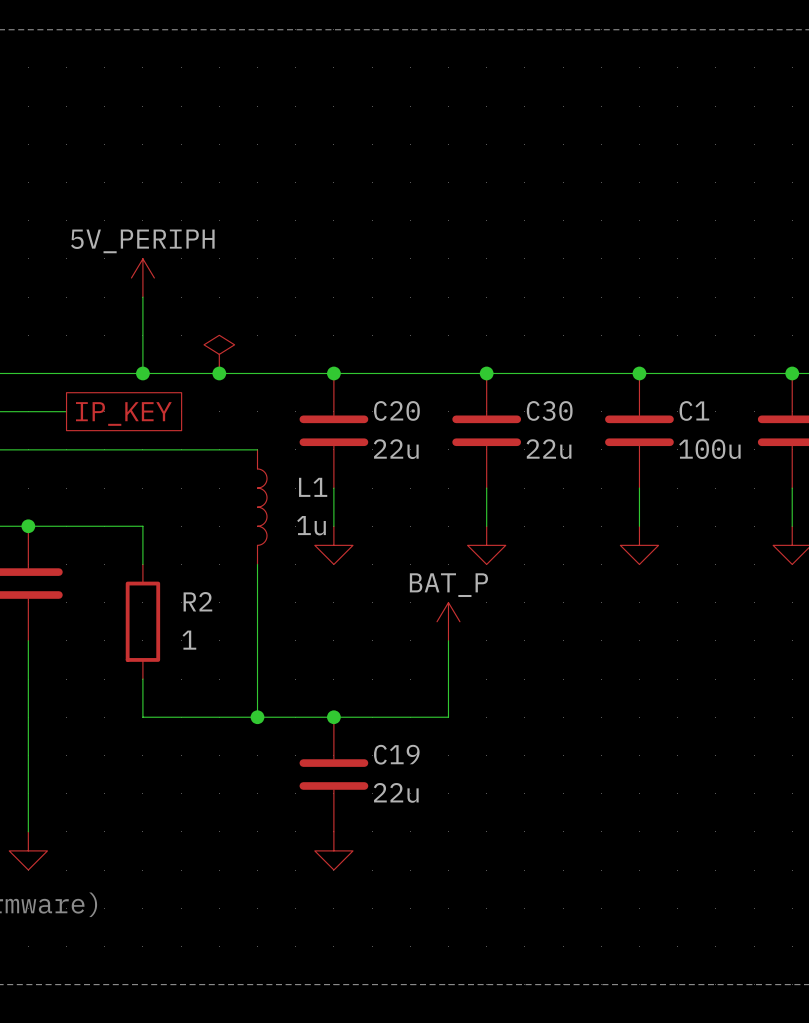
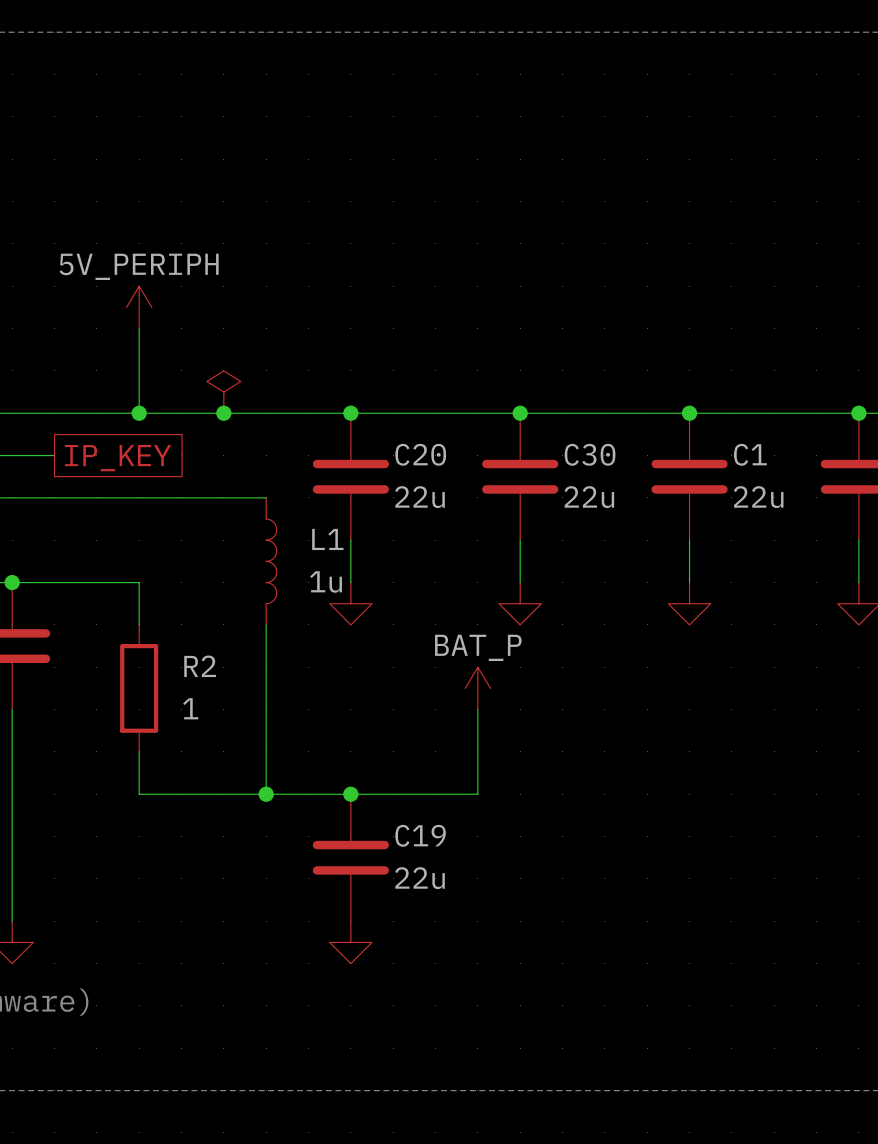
C1 value: 100u (709, 449) -> 22u (758, 497)

